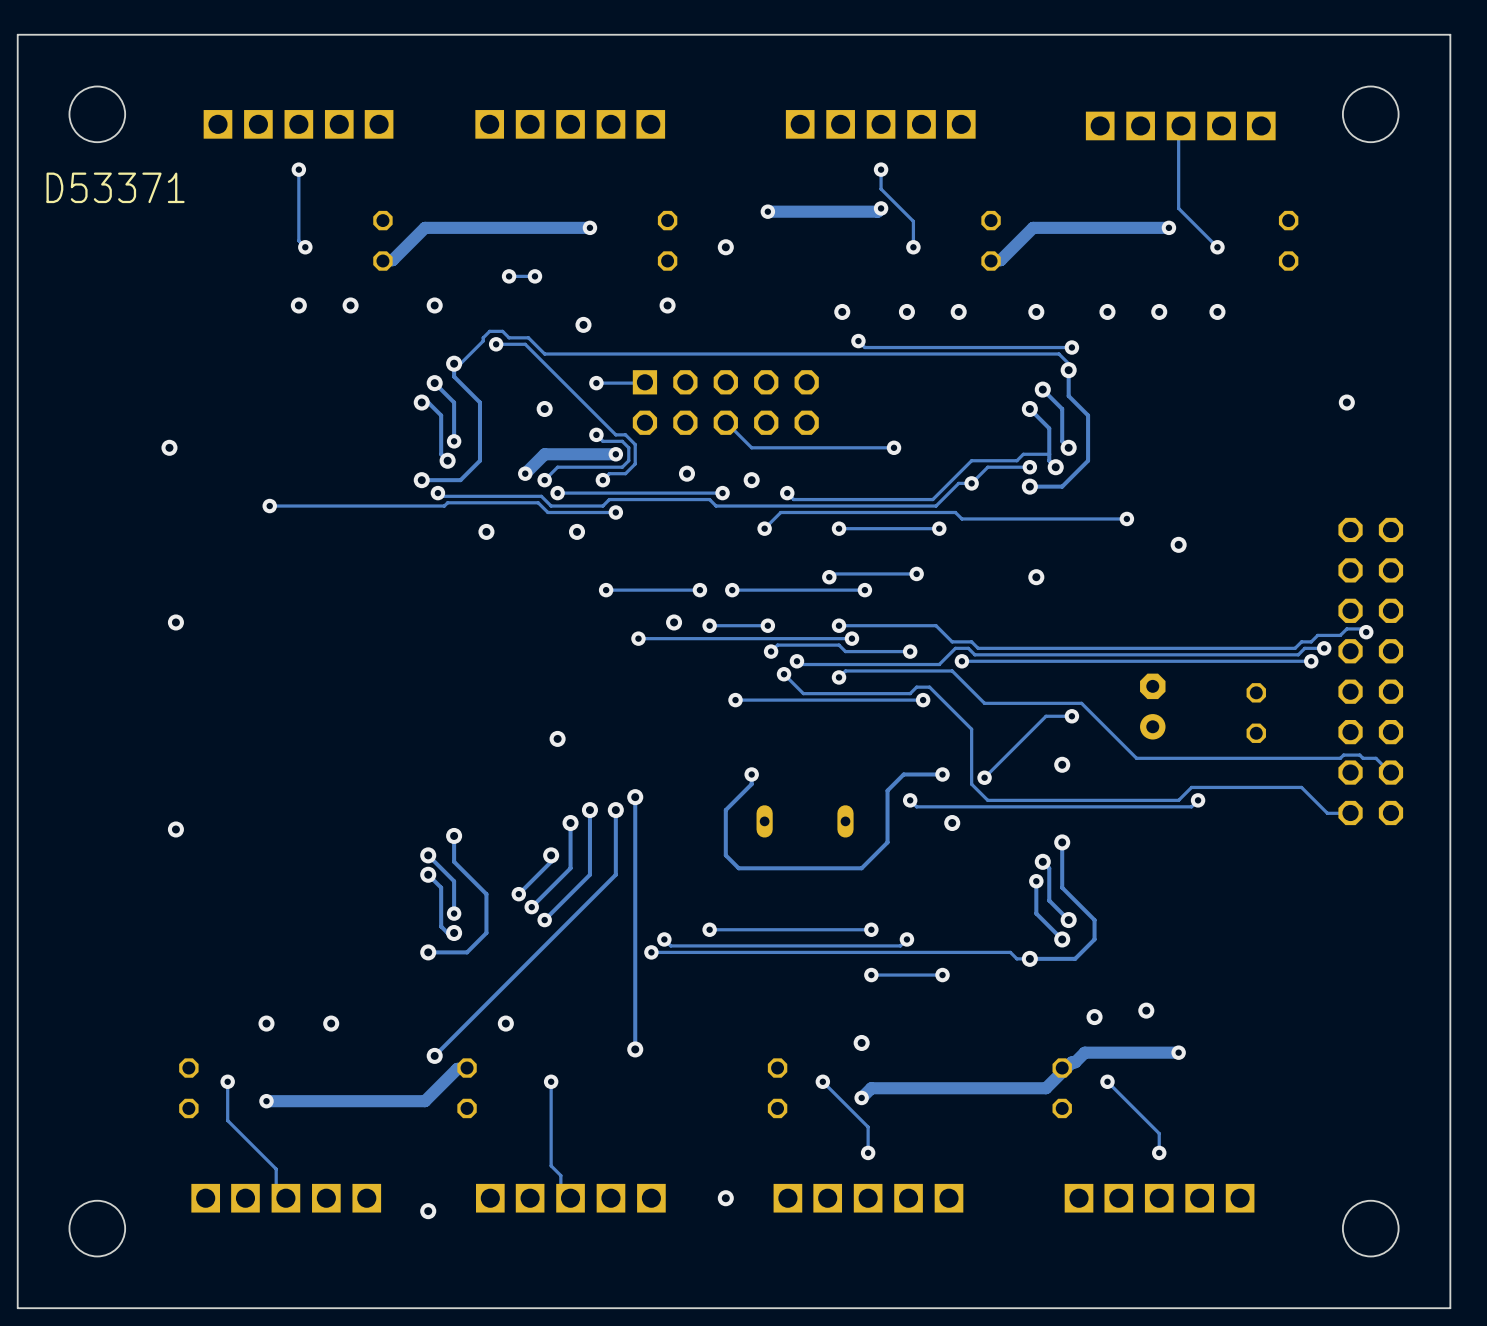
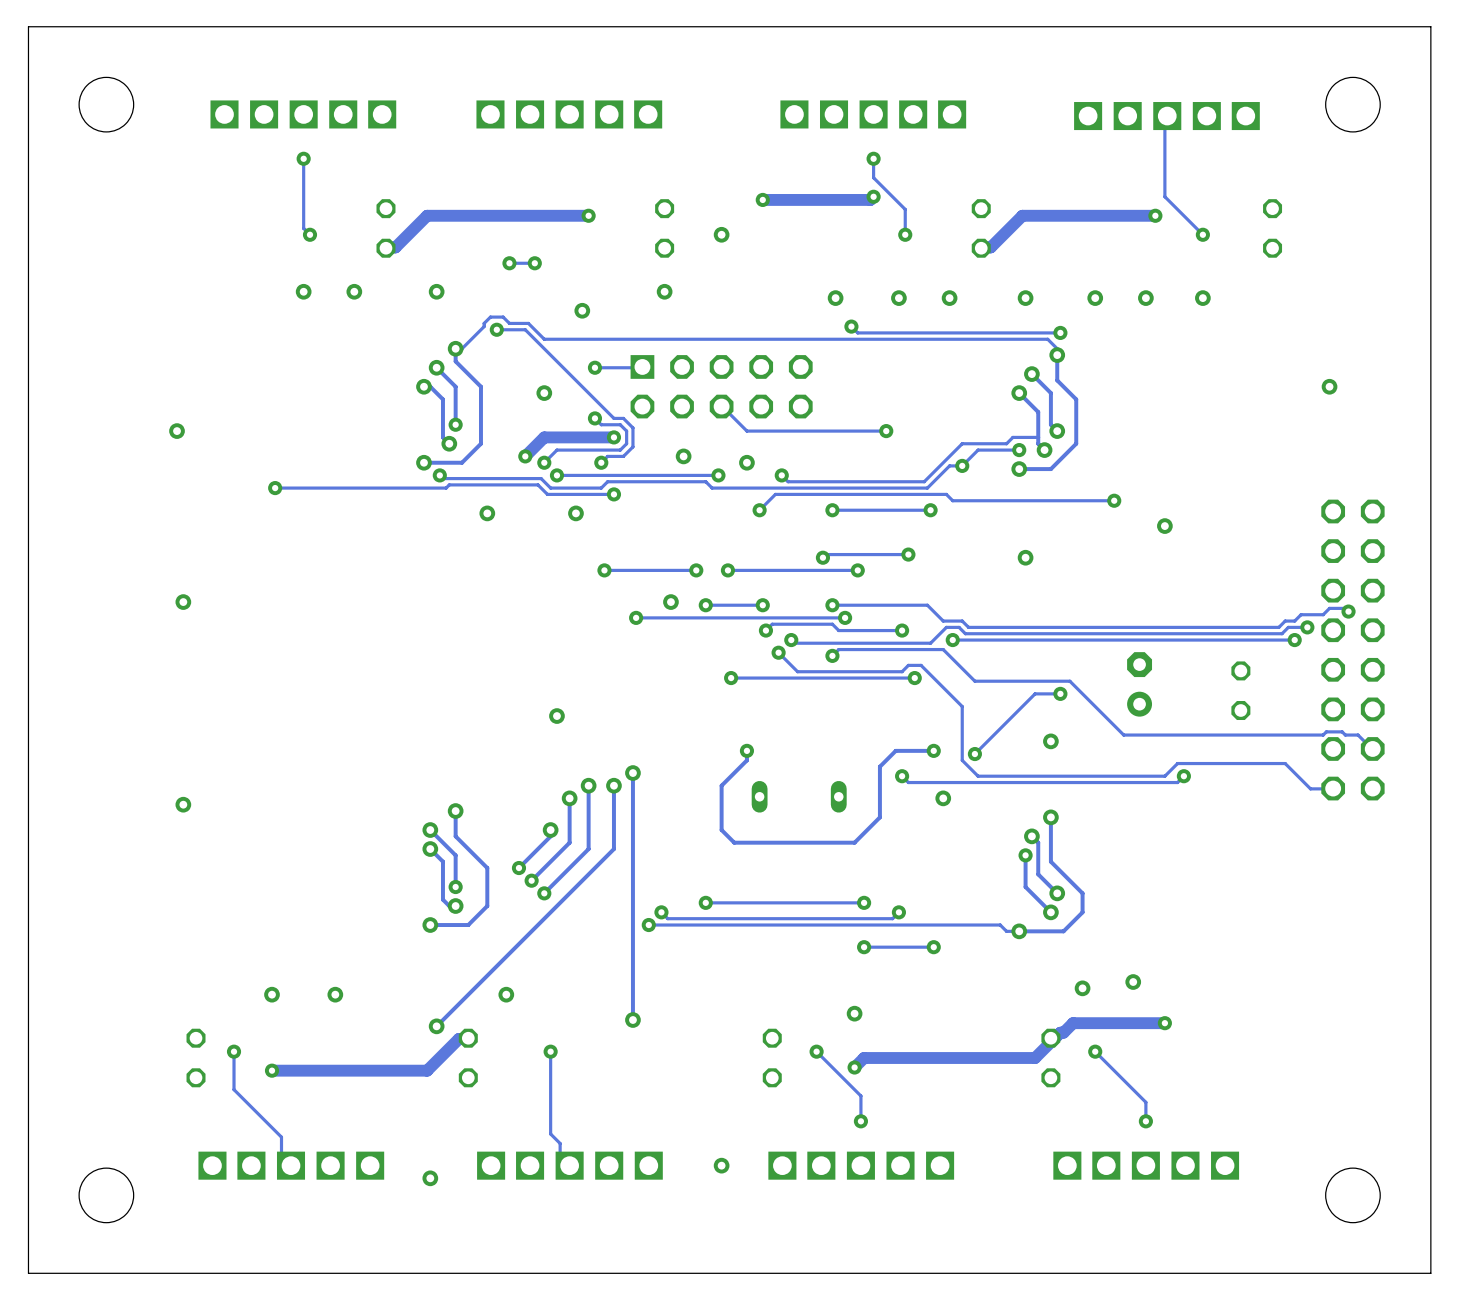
text: D53371 (115, 187) -> none

